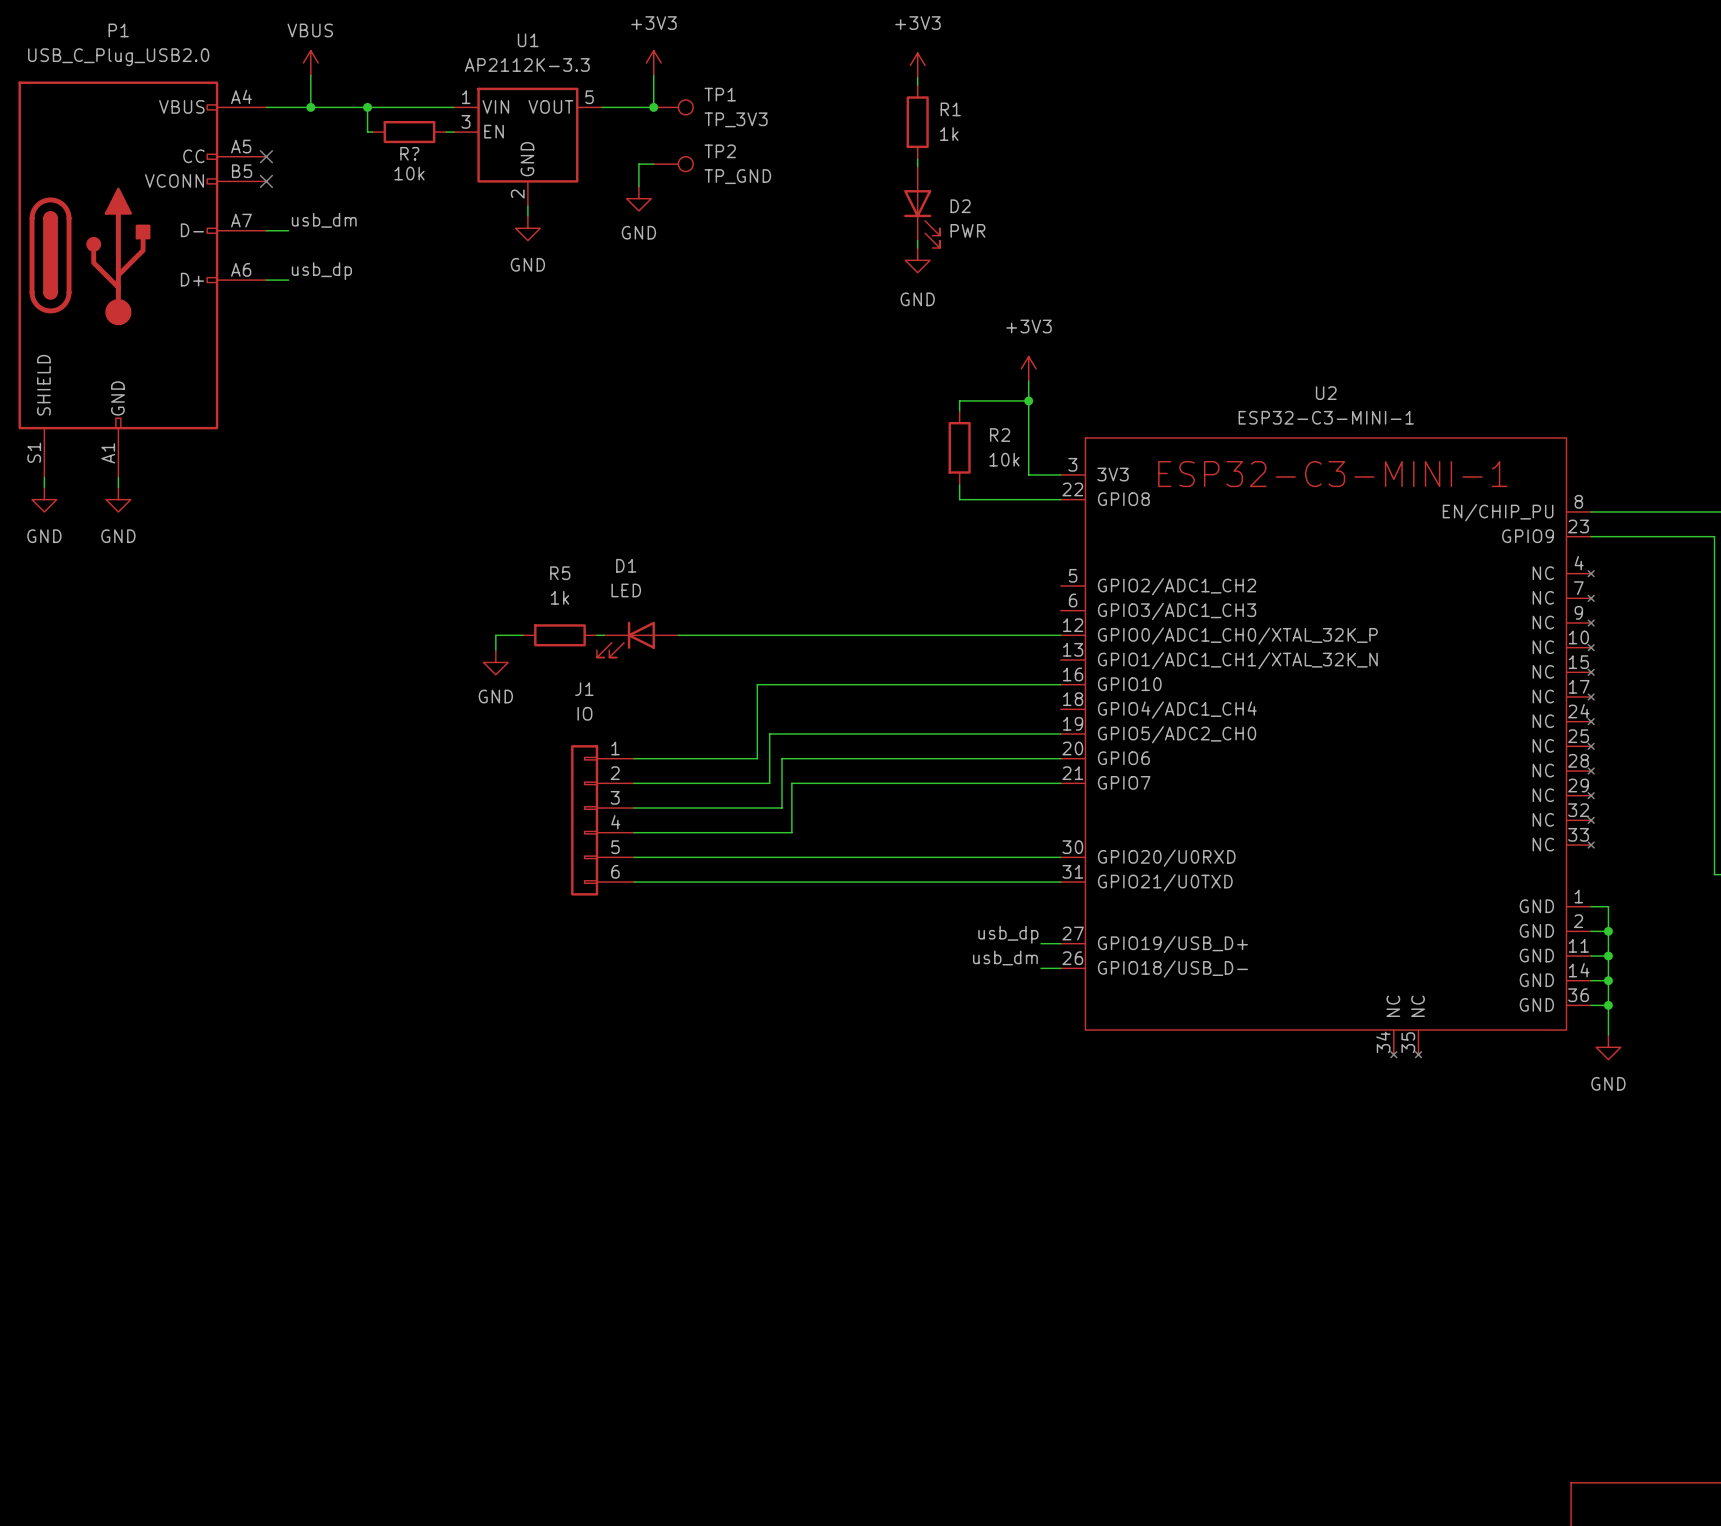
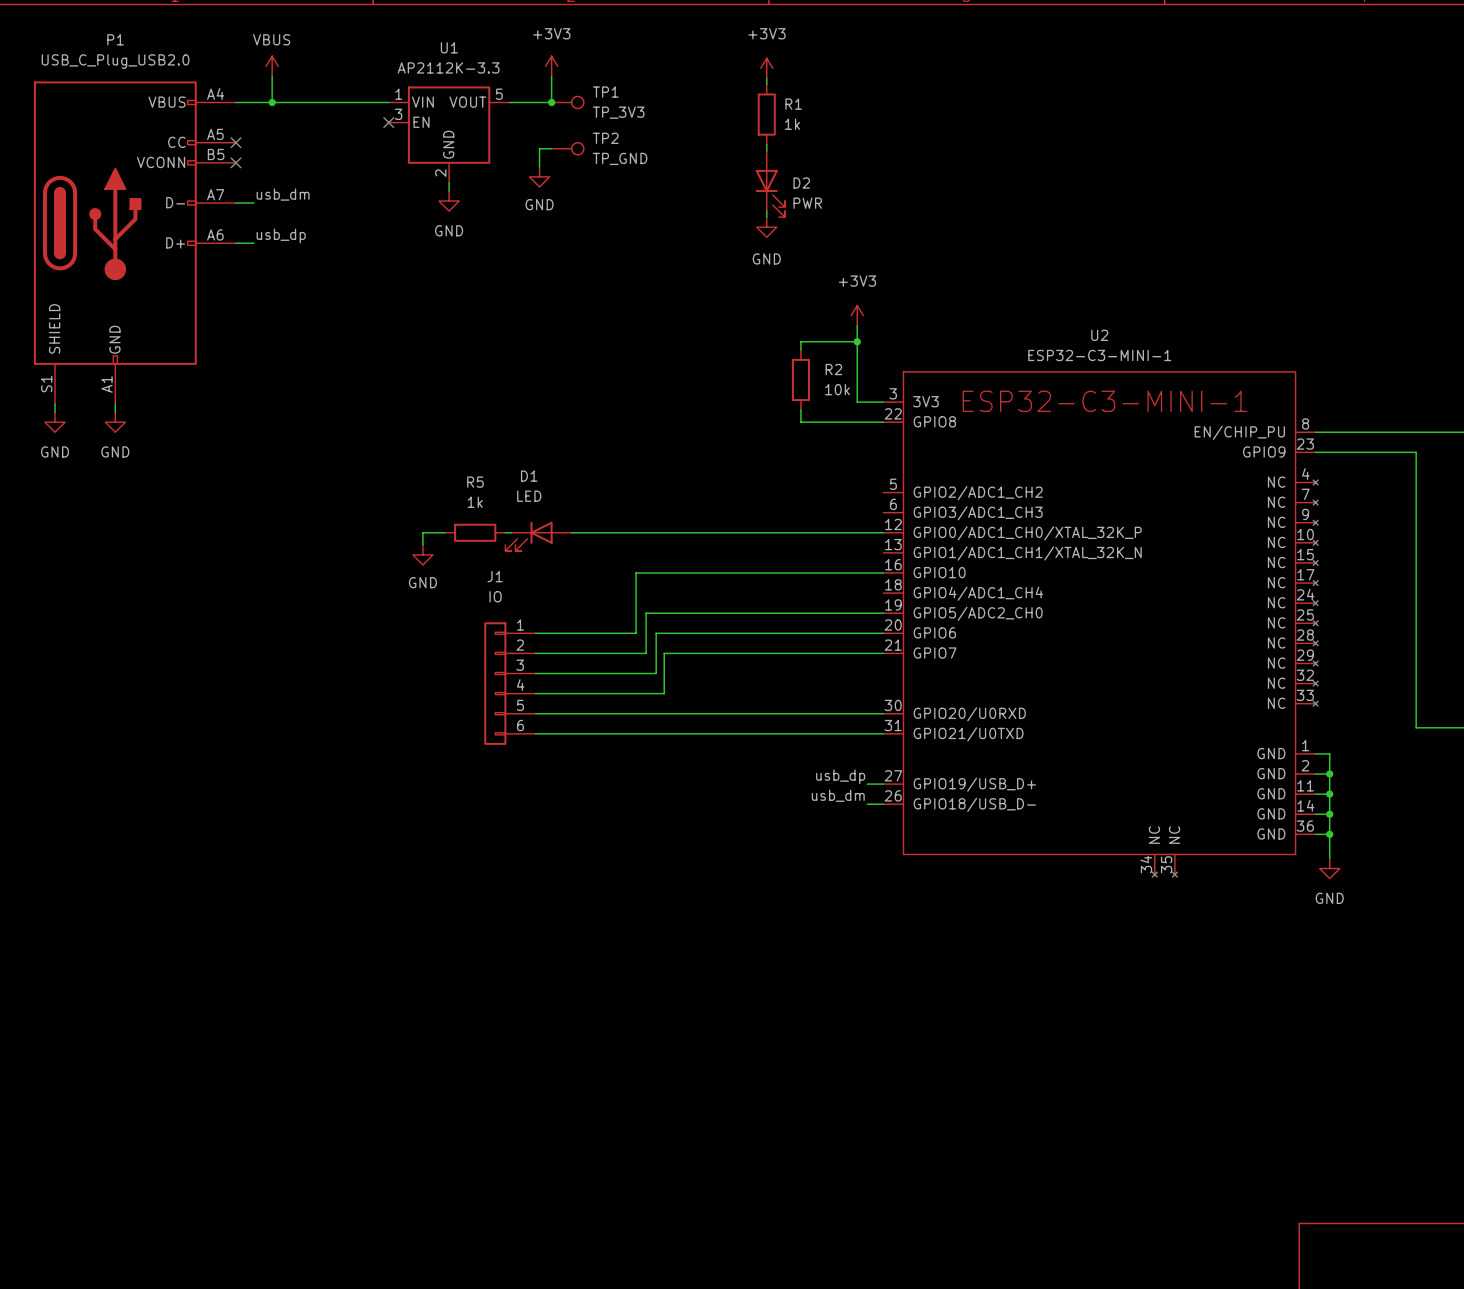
wire: (367, 107) (367, 132) (372, 132) -> none
junction: (367, 107) -> none
R?: 10k (409, 132) -> none
wire: (446, 132) (453, 132) -> none
no-connect mark: none -> (388, 122)

